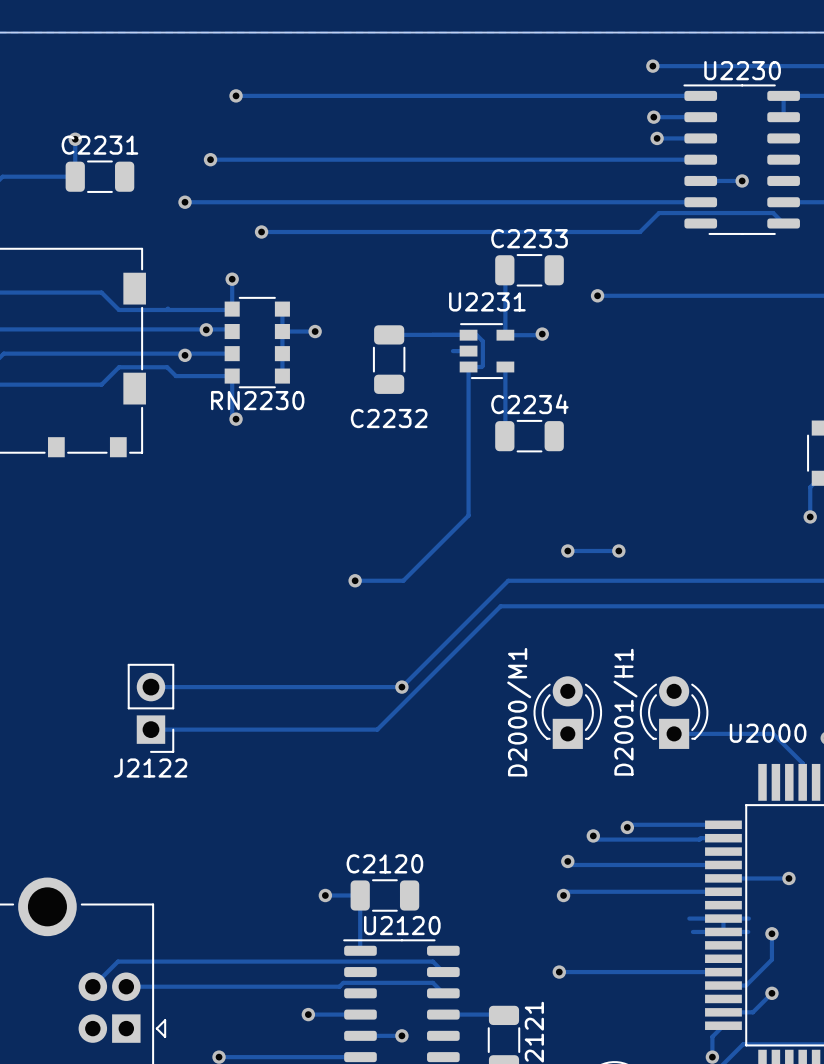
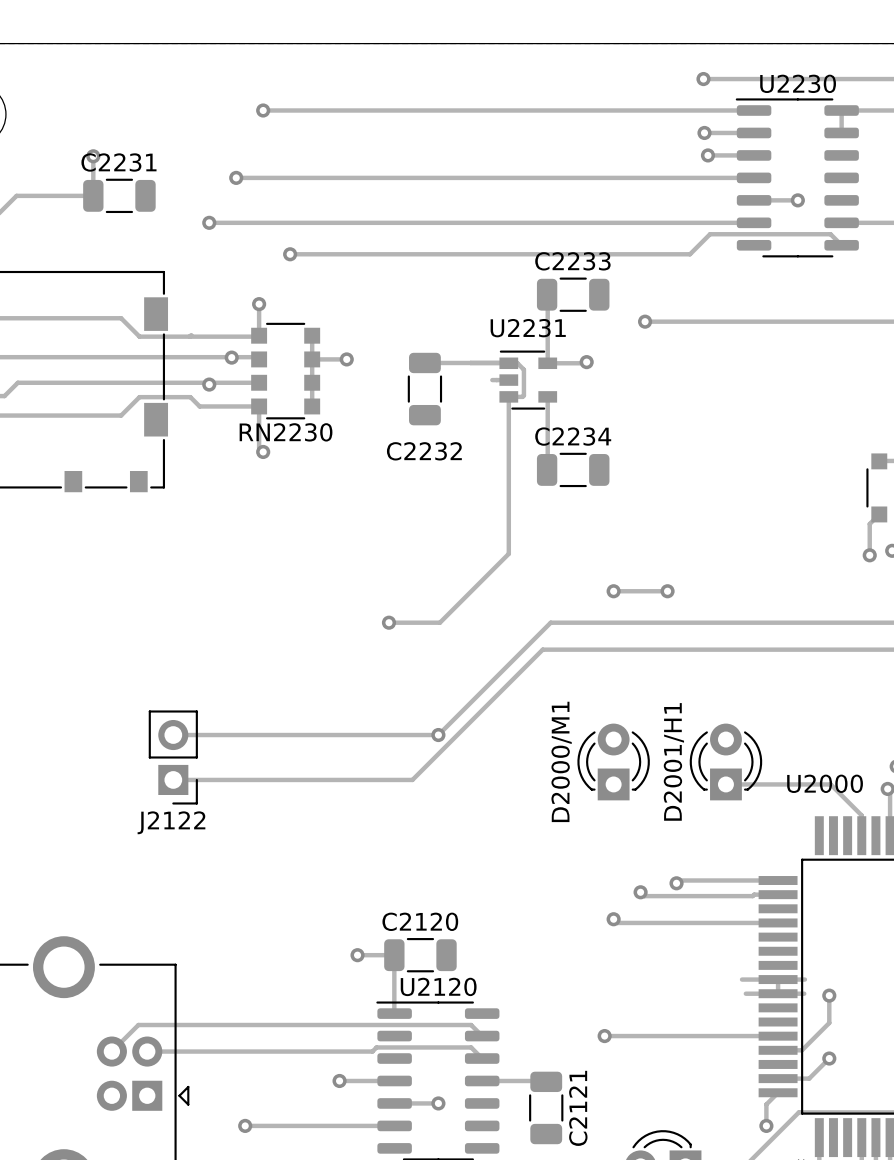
track: (723, 878) (788, 878) -> none
via: (788, 878) -> none
track: (723, 891) (567, 891) (563, 895) -> none
via: (563, 895) -> none

